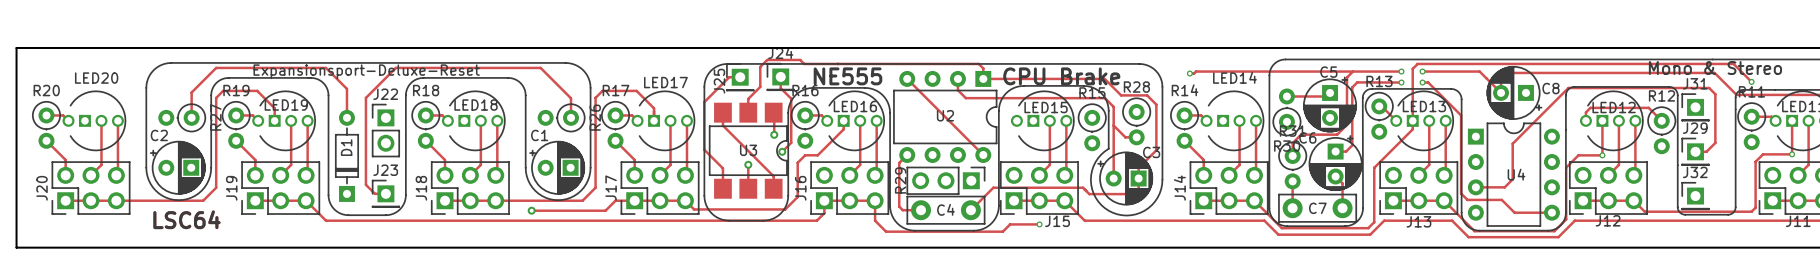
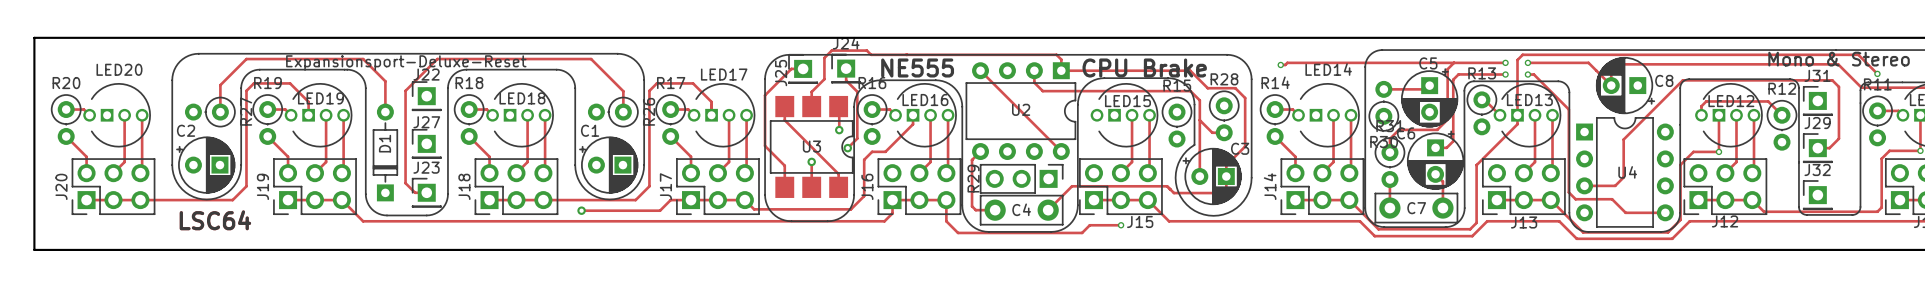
J22 footprint: [372, 103, 400, 158] -> [412, 81, 442, 111]
J27: none -> (426, 143)

